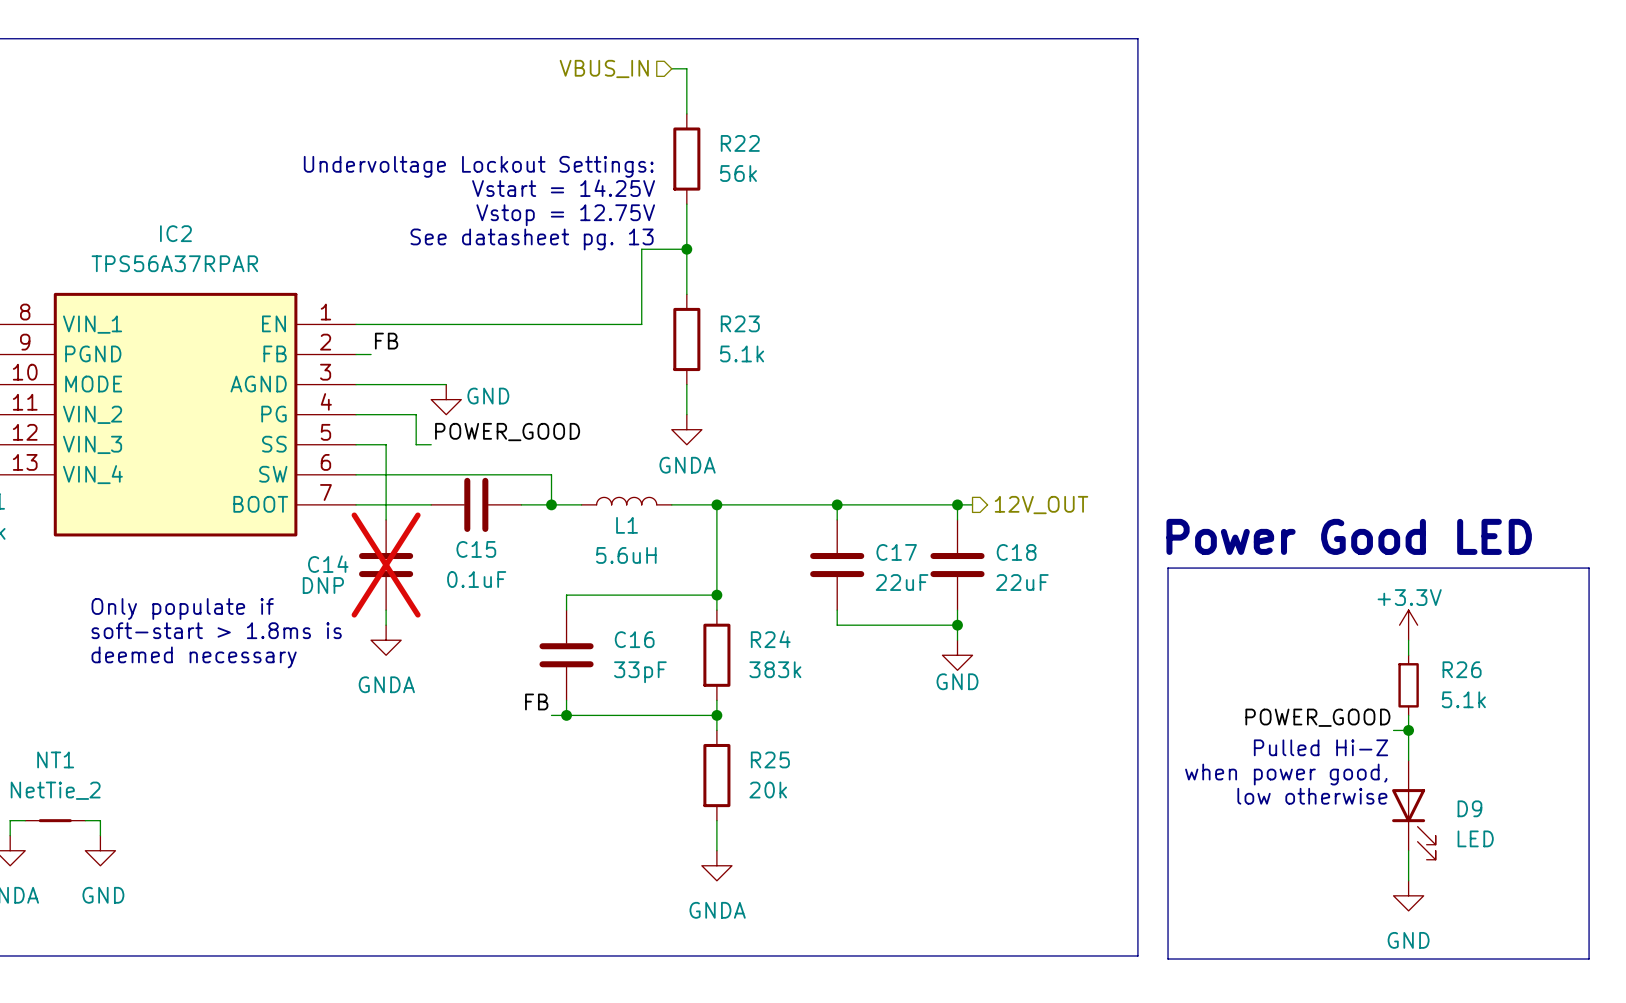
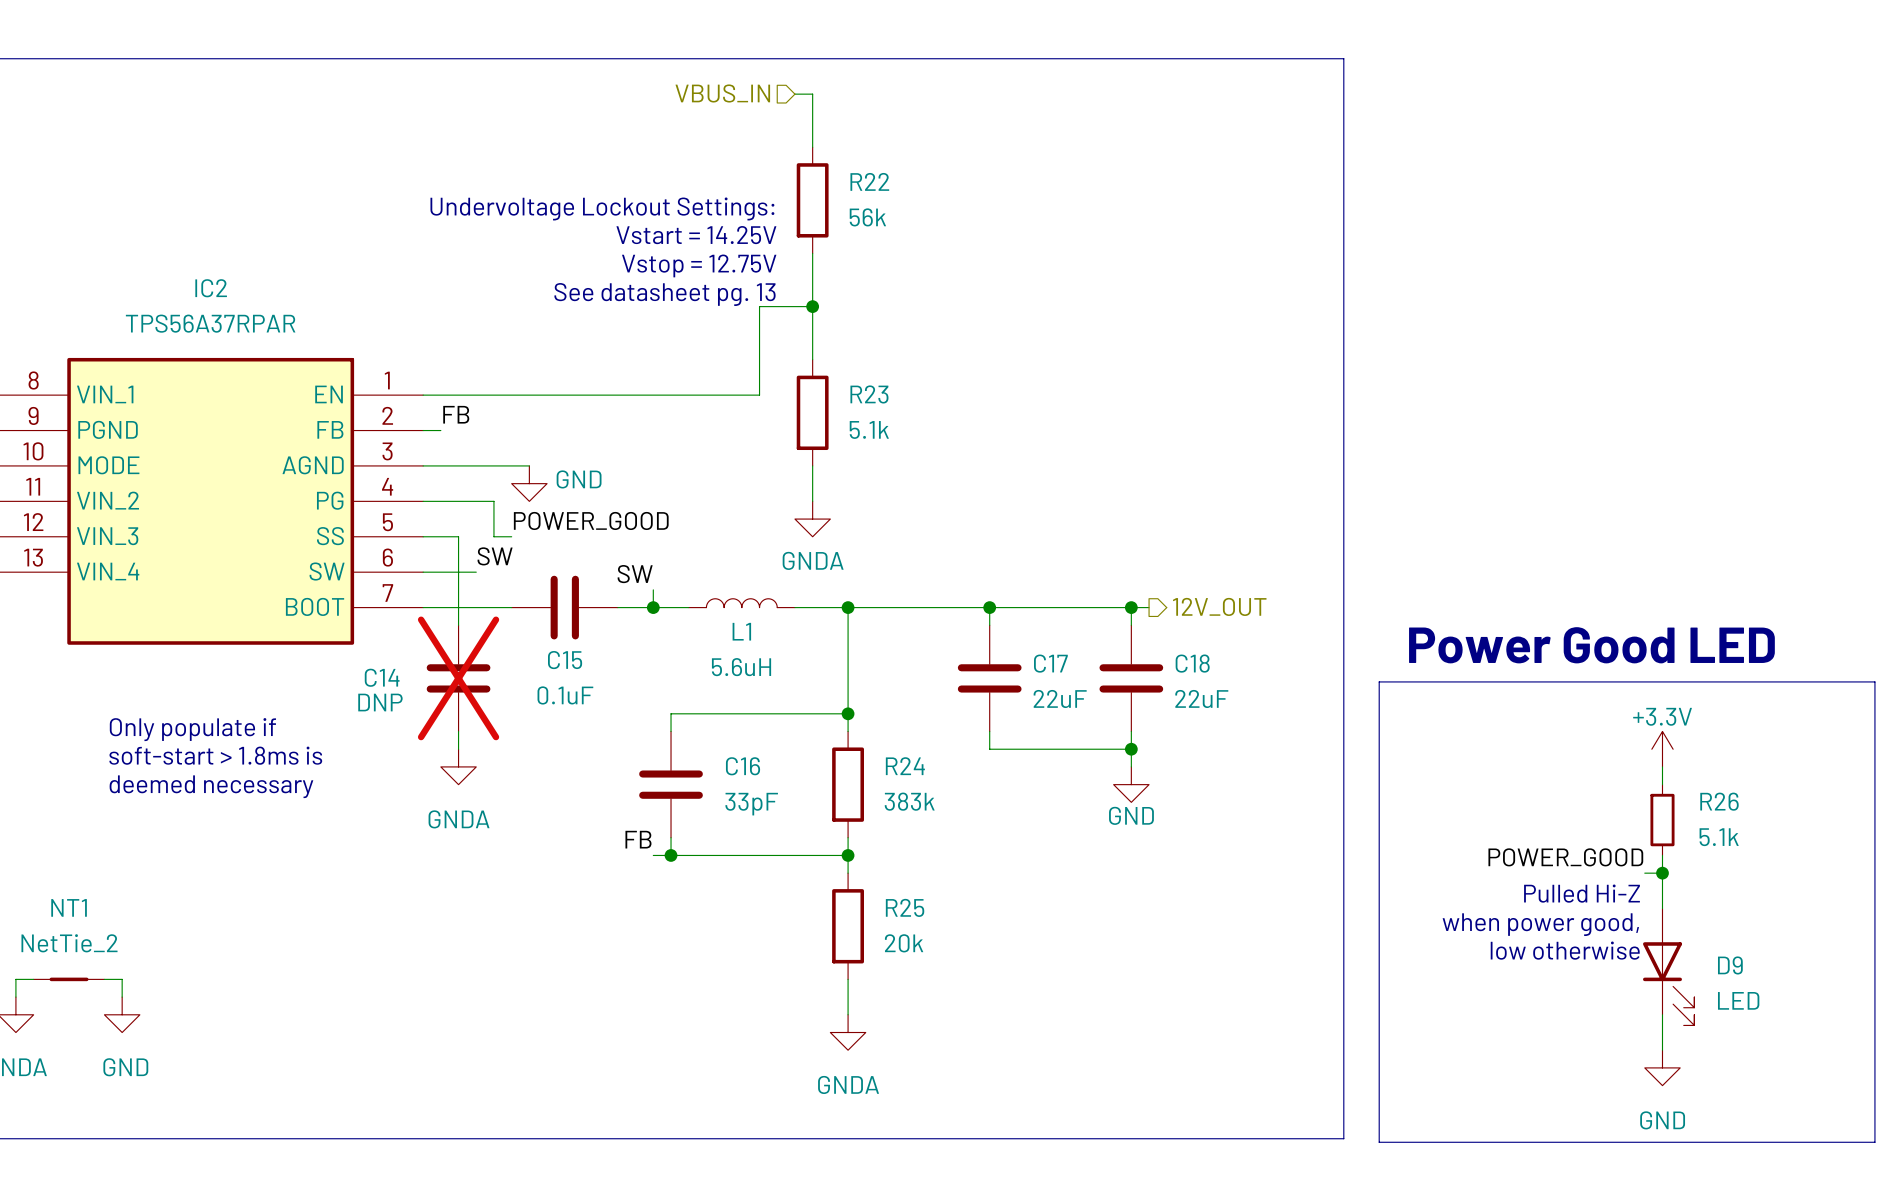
label: none -> SW (495, 556)
wire: (401, 474) (551, 474) (551, 489) -> none
label: none -> SW (635, 574)

